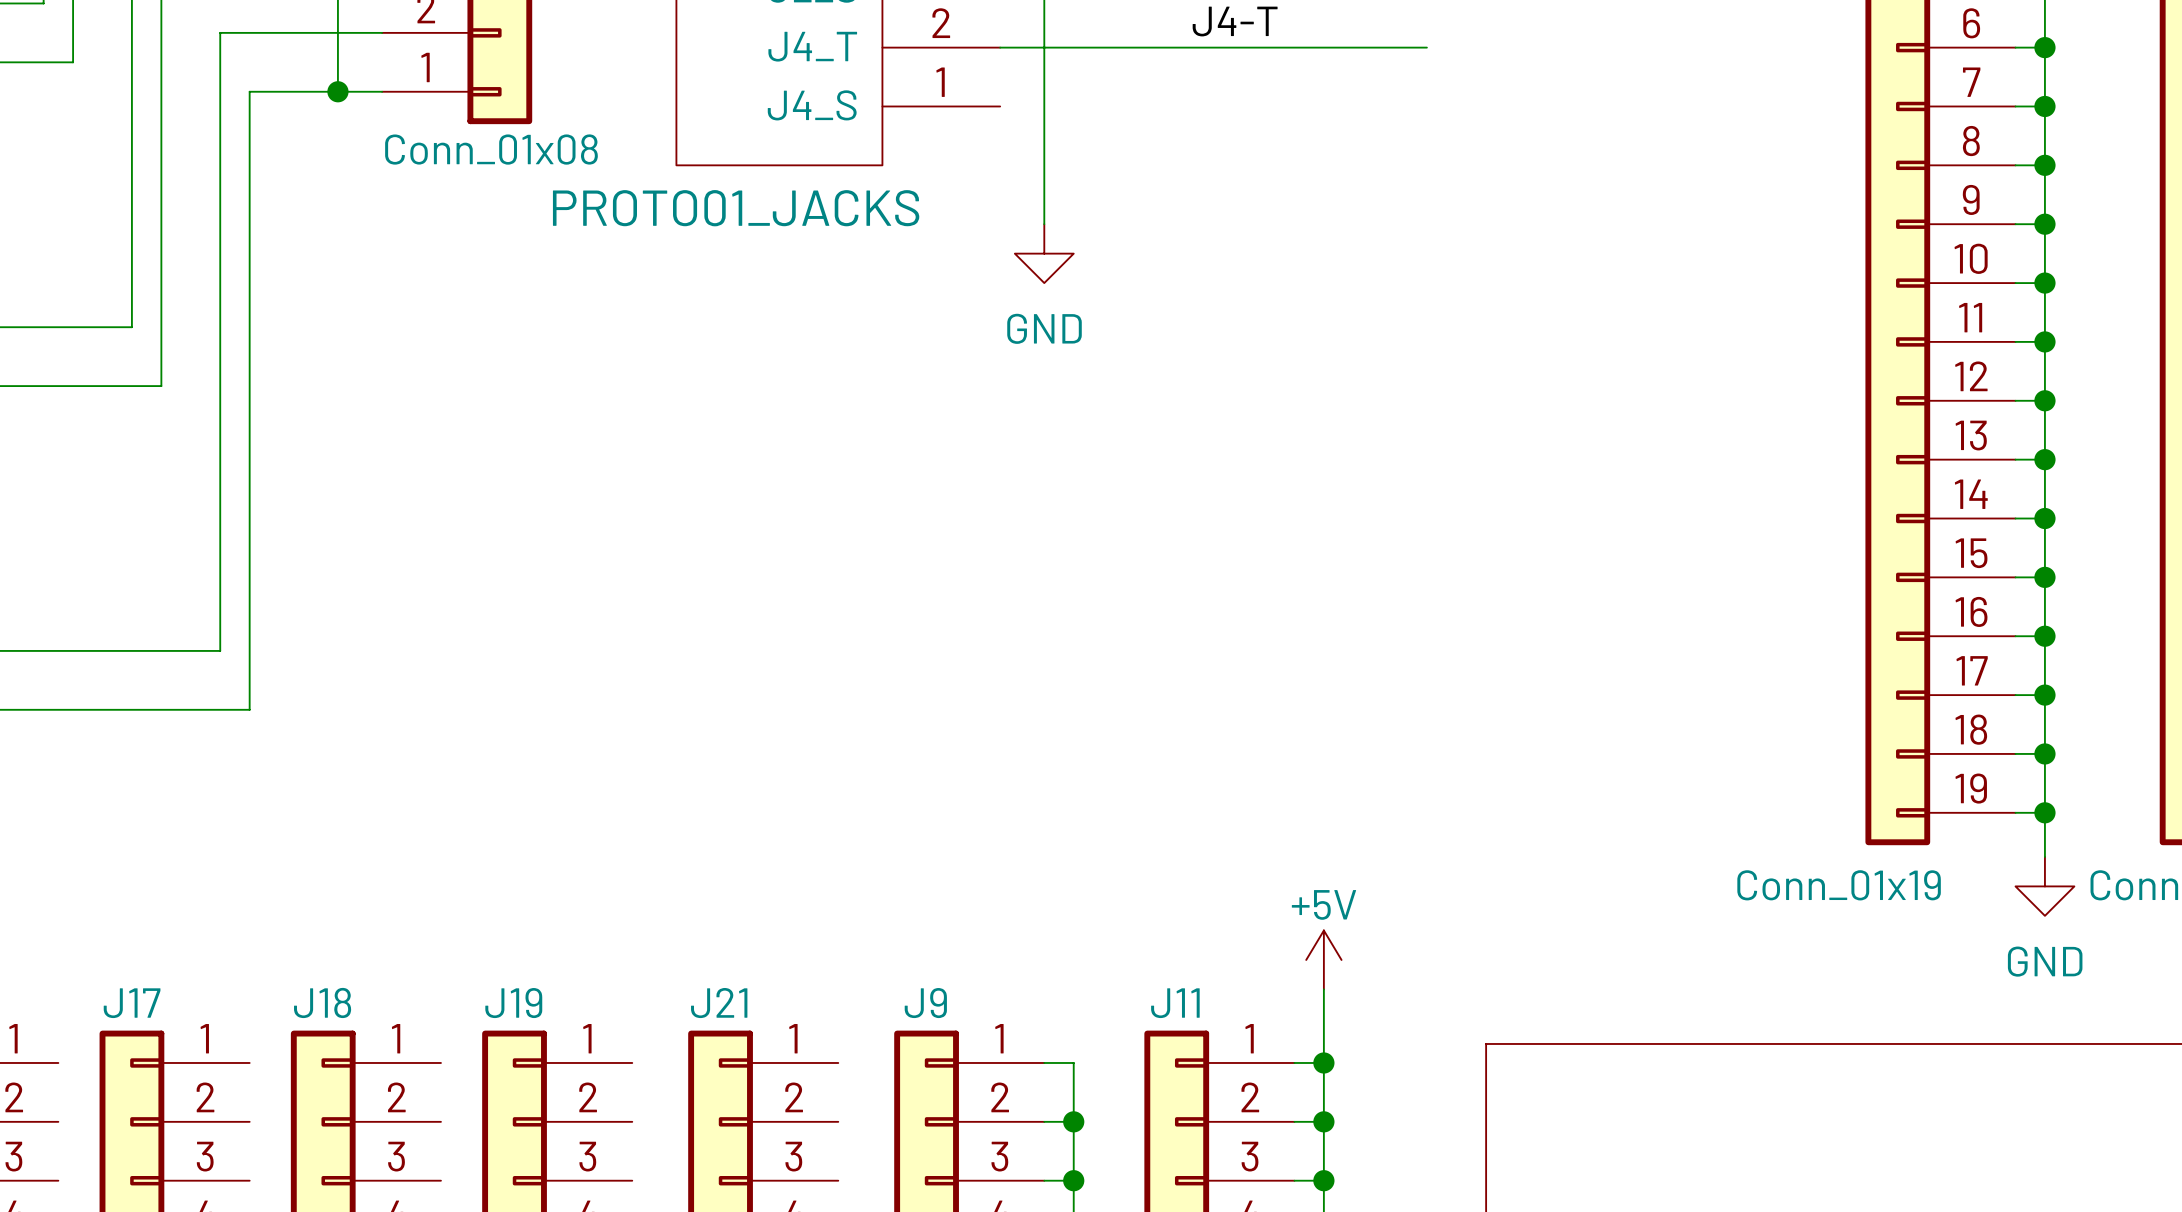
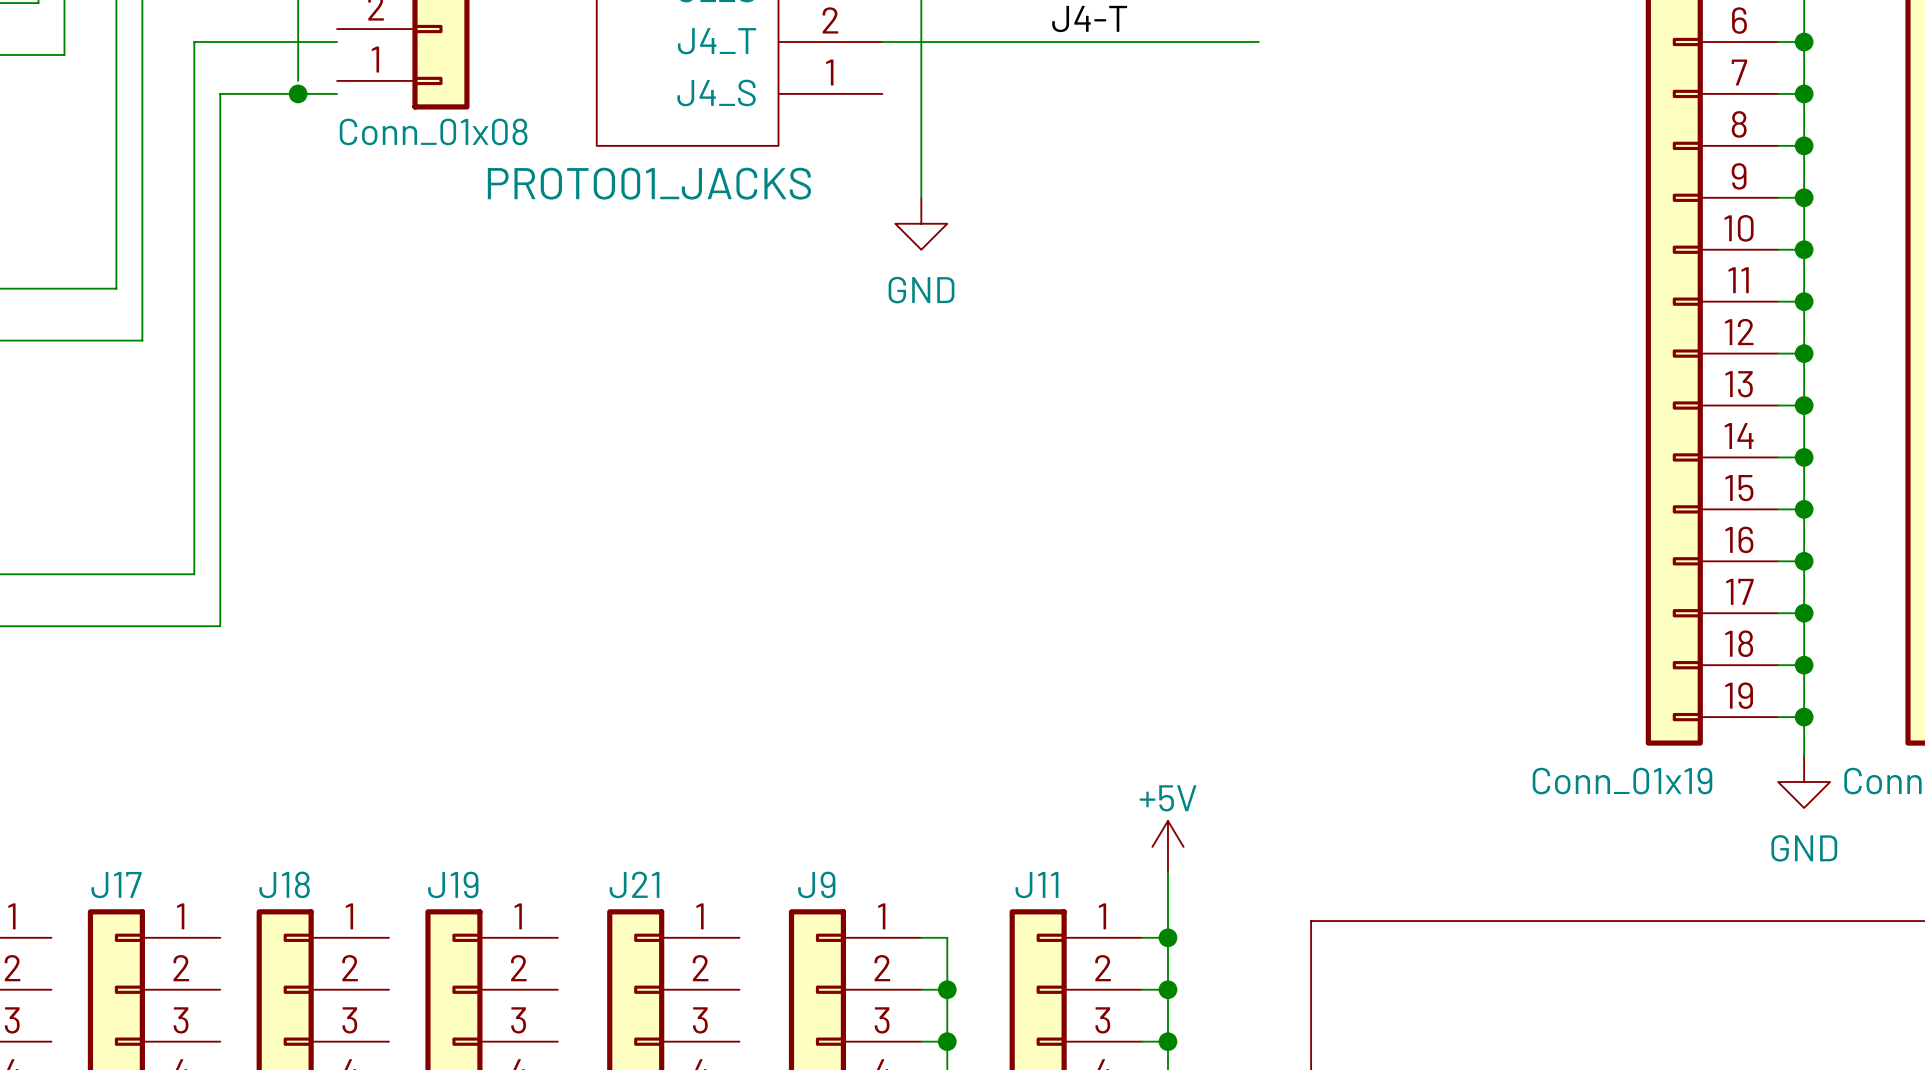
wire: (382, 32) (220, 32) (220, 47) -> (337, 42) (194, 42)
junction position: (337, 91) -> (298, 93)
wire: (382, 91) (249, 91) (249, 106) -> (337, 93) (220, 93)

